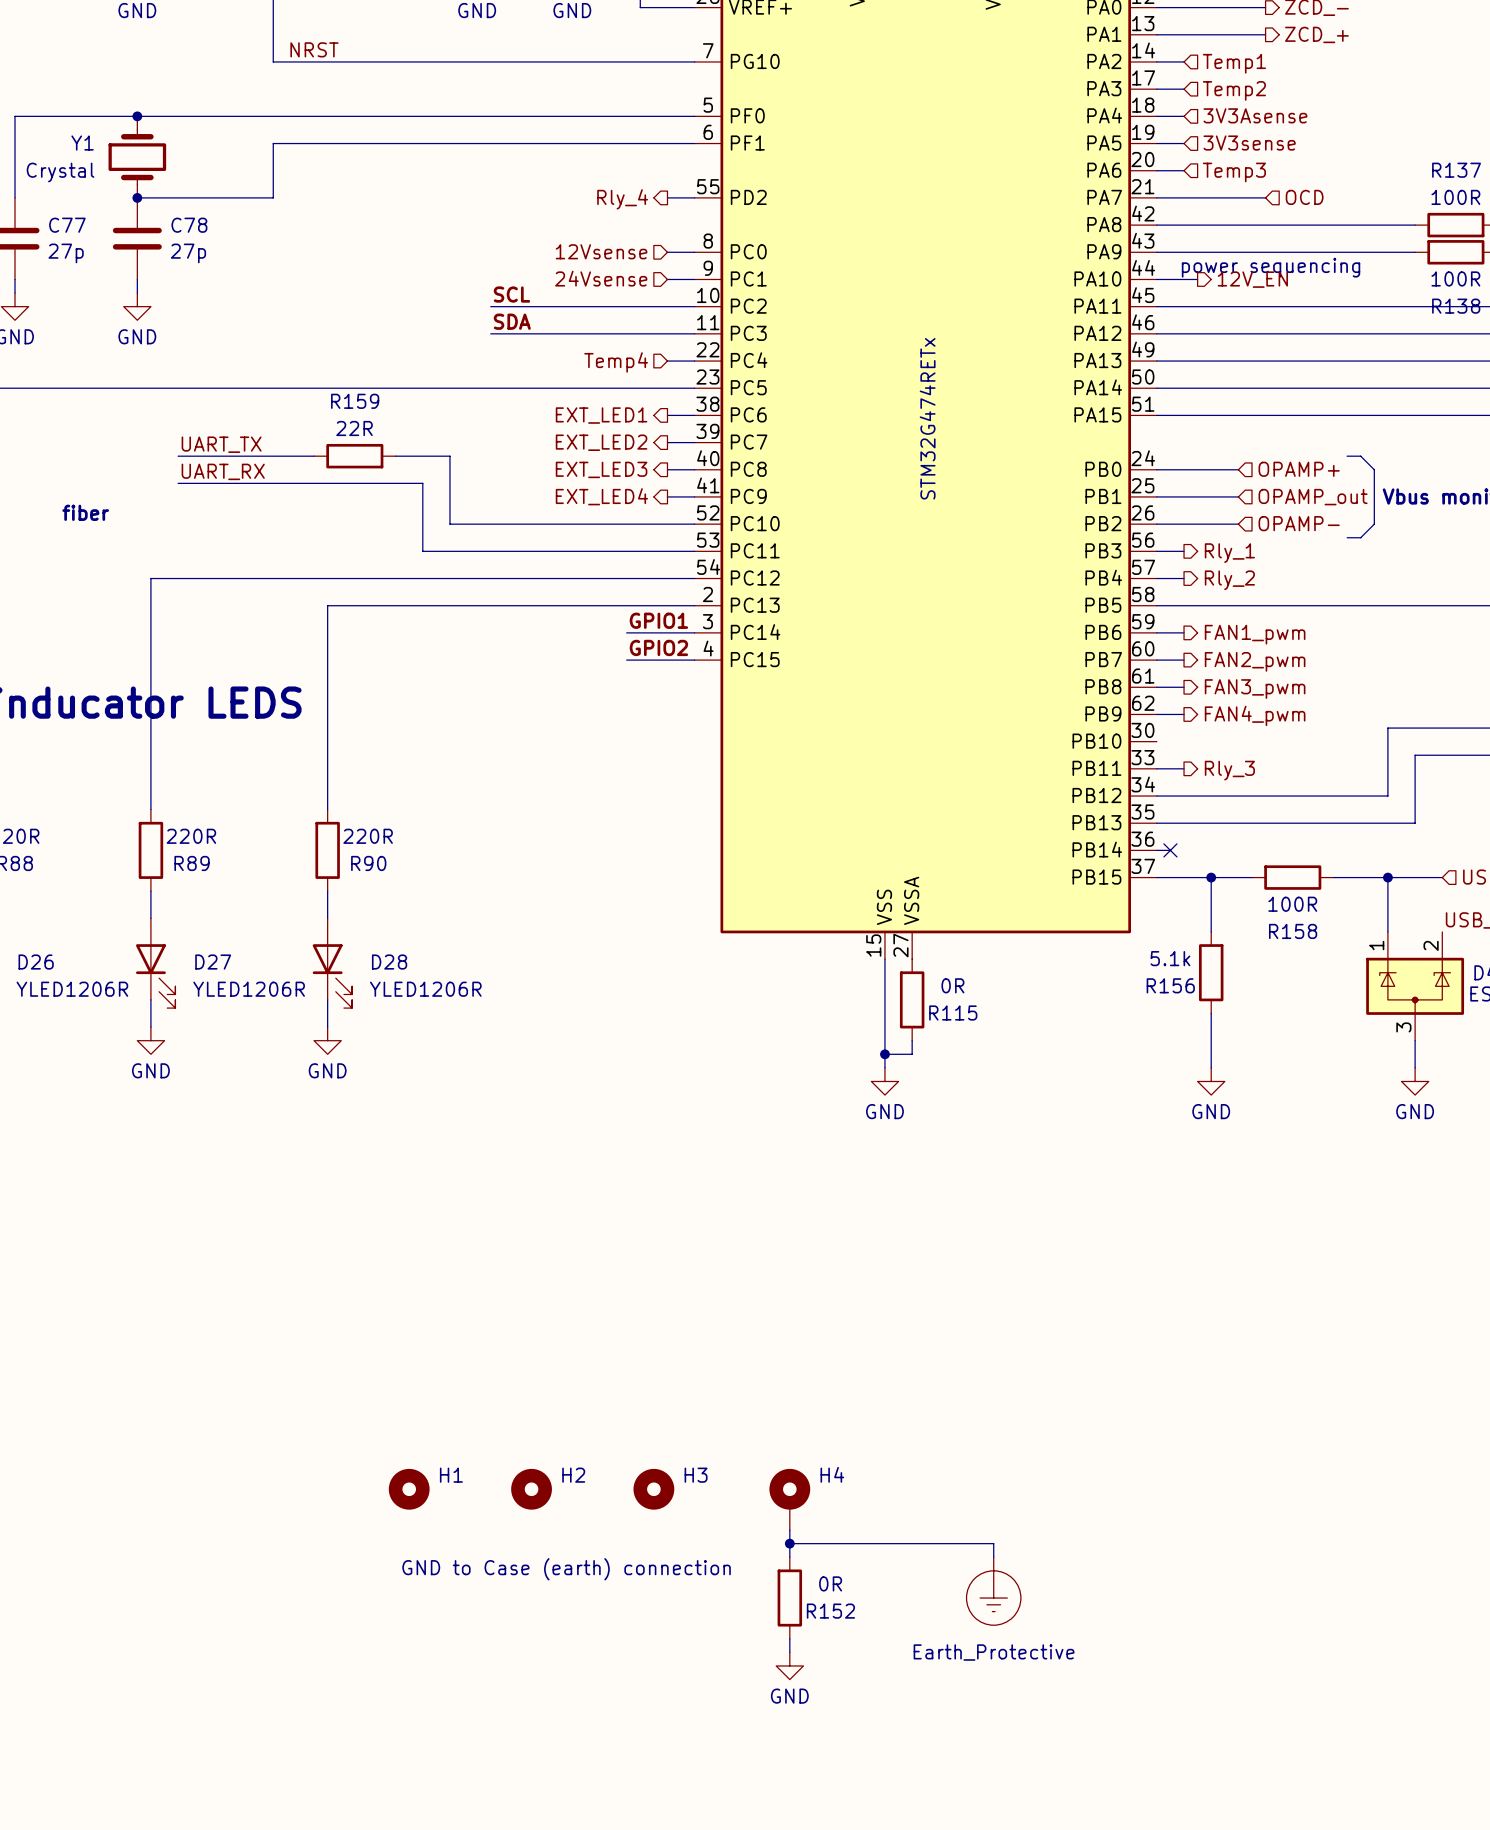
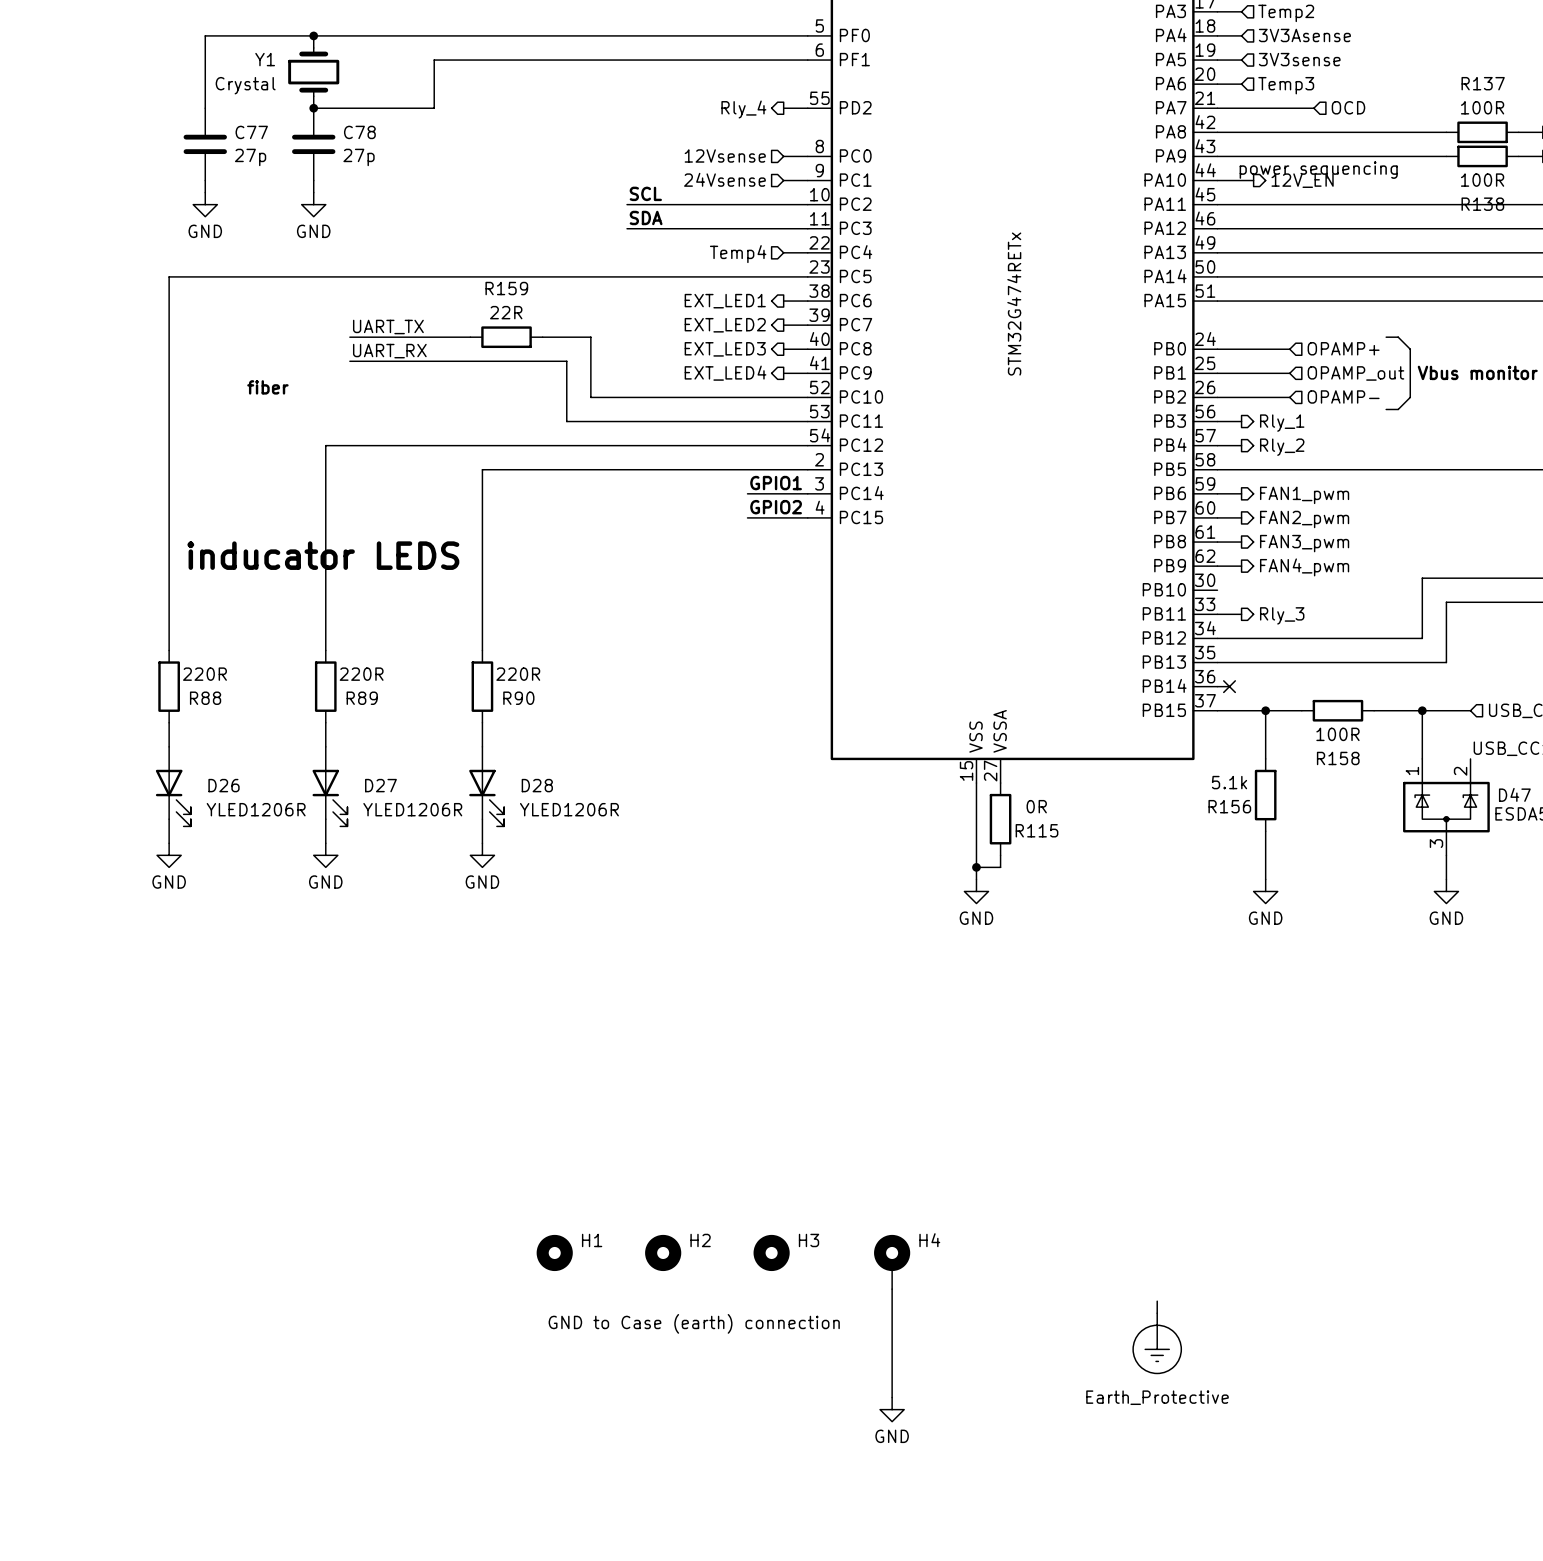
wire: (789, 1543) (993, 1543) (993, 1557) -> none
junction: (789, 1543) -> none
wire: none -> (1157, 1301) (1157, 1313)
wire: none -> (892, 1313) (892, 1385)
power symbol position: Earth_Protective (993, 1591) -> Earth_Protective (1157, 1343)
R152: 0R (789, 1598) -> none

